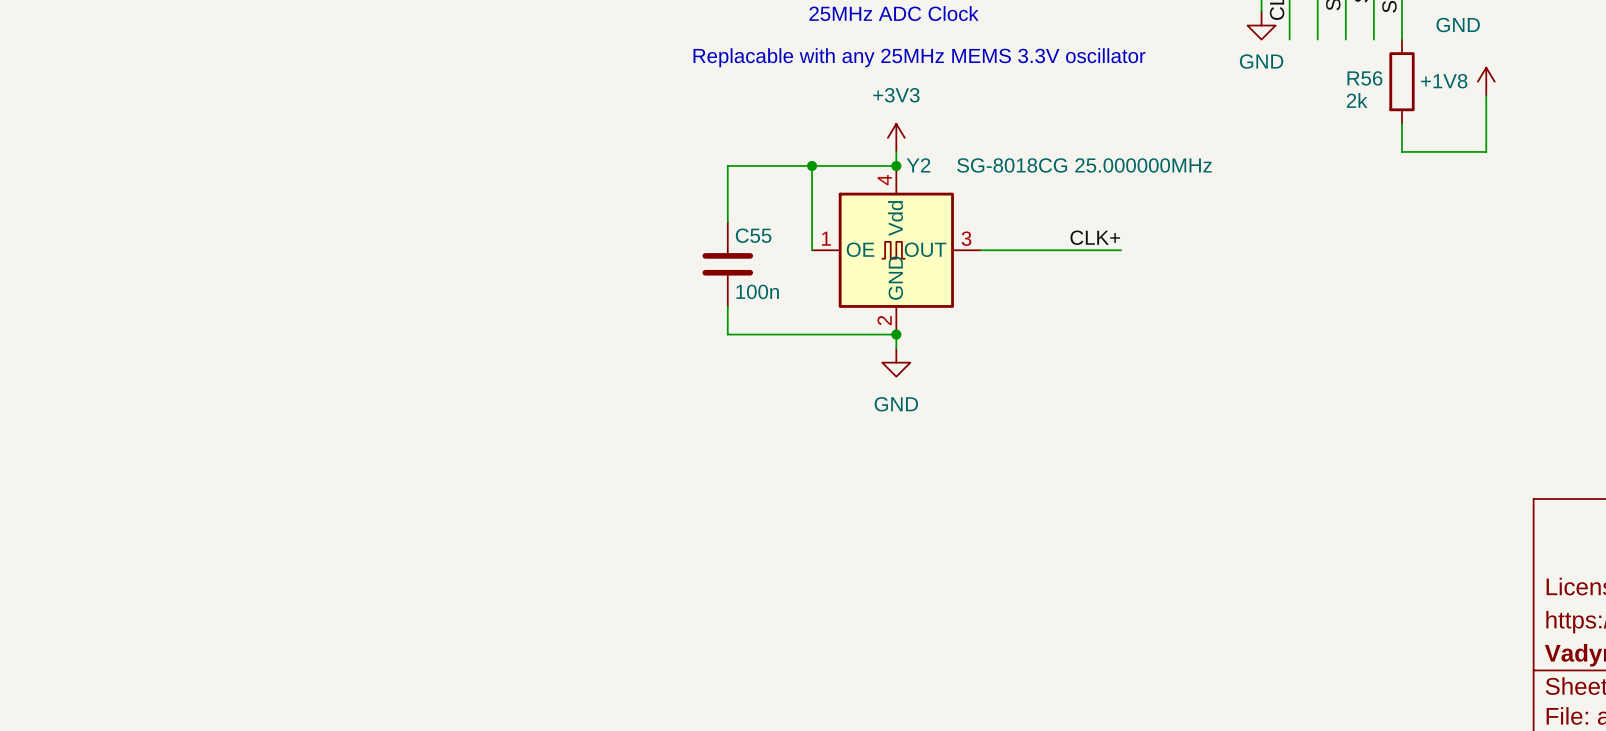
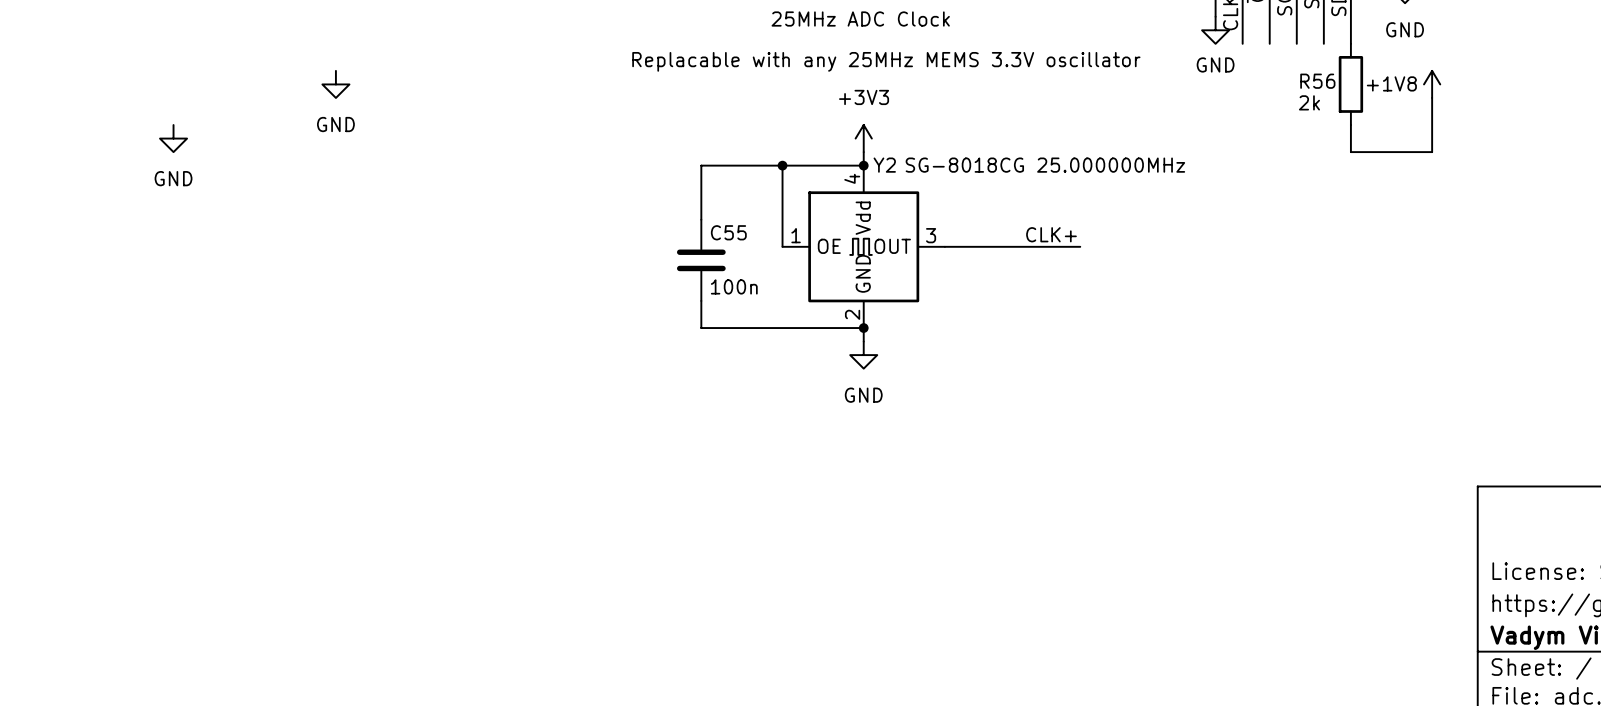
power symbol: none -> GND (335, 84)
power symbol: none -> GND (173, 138)

